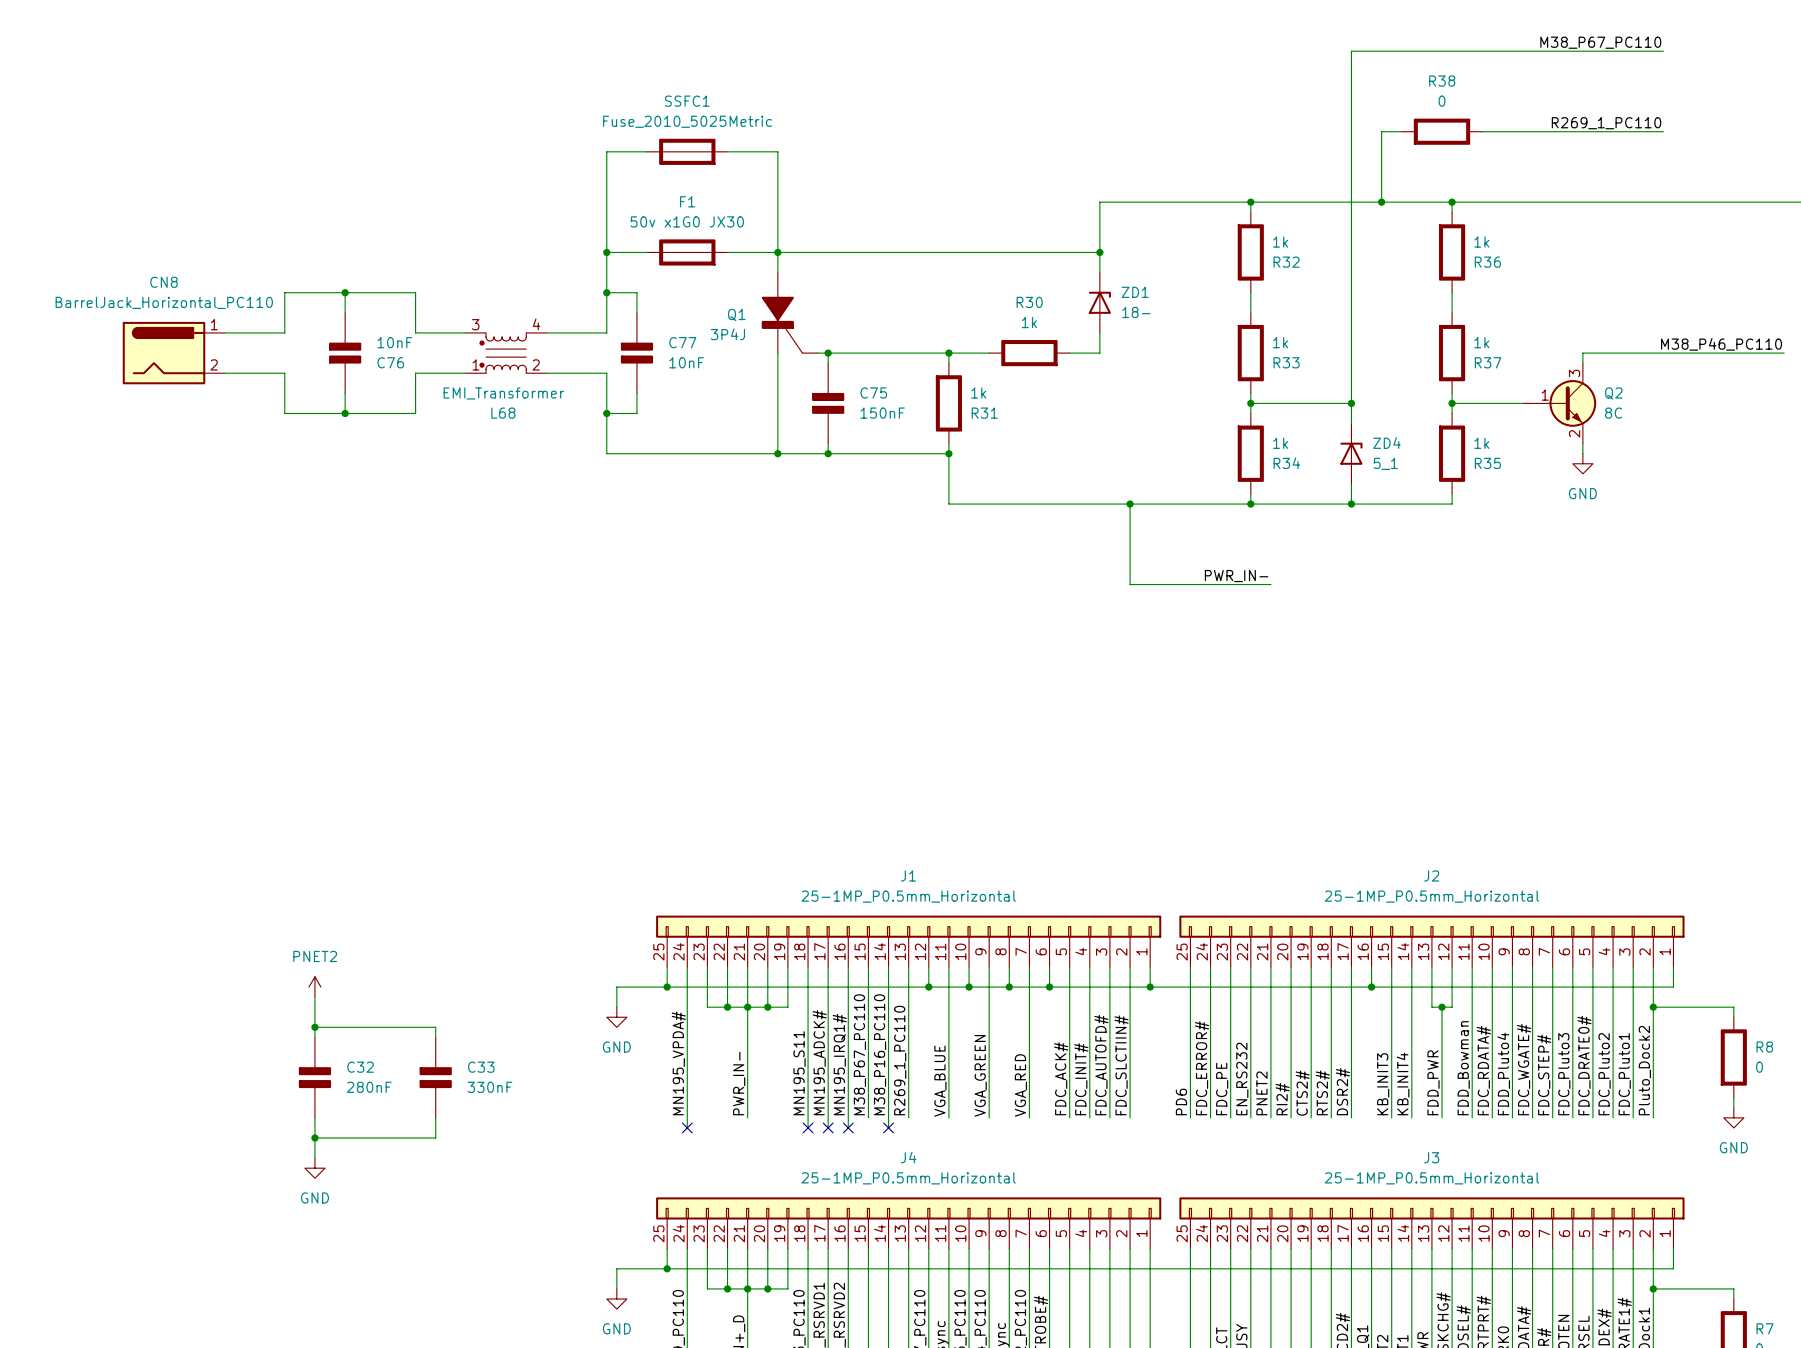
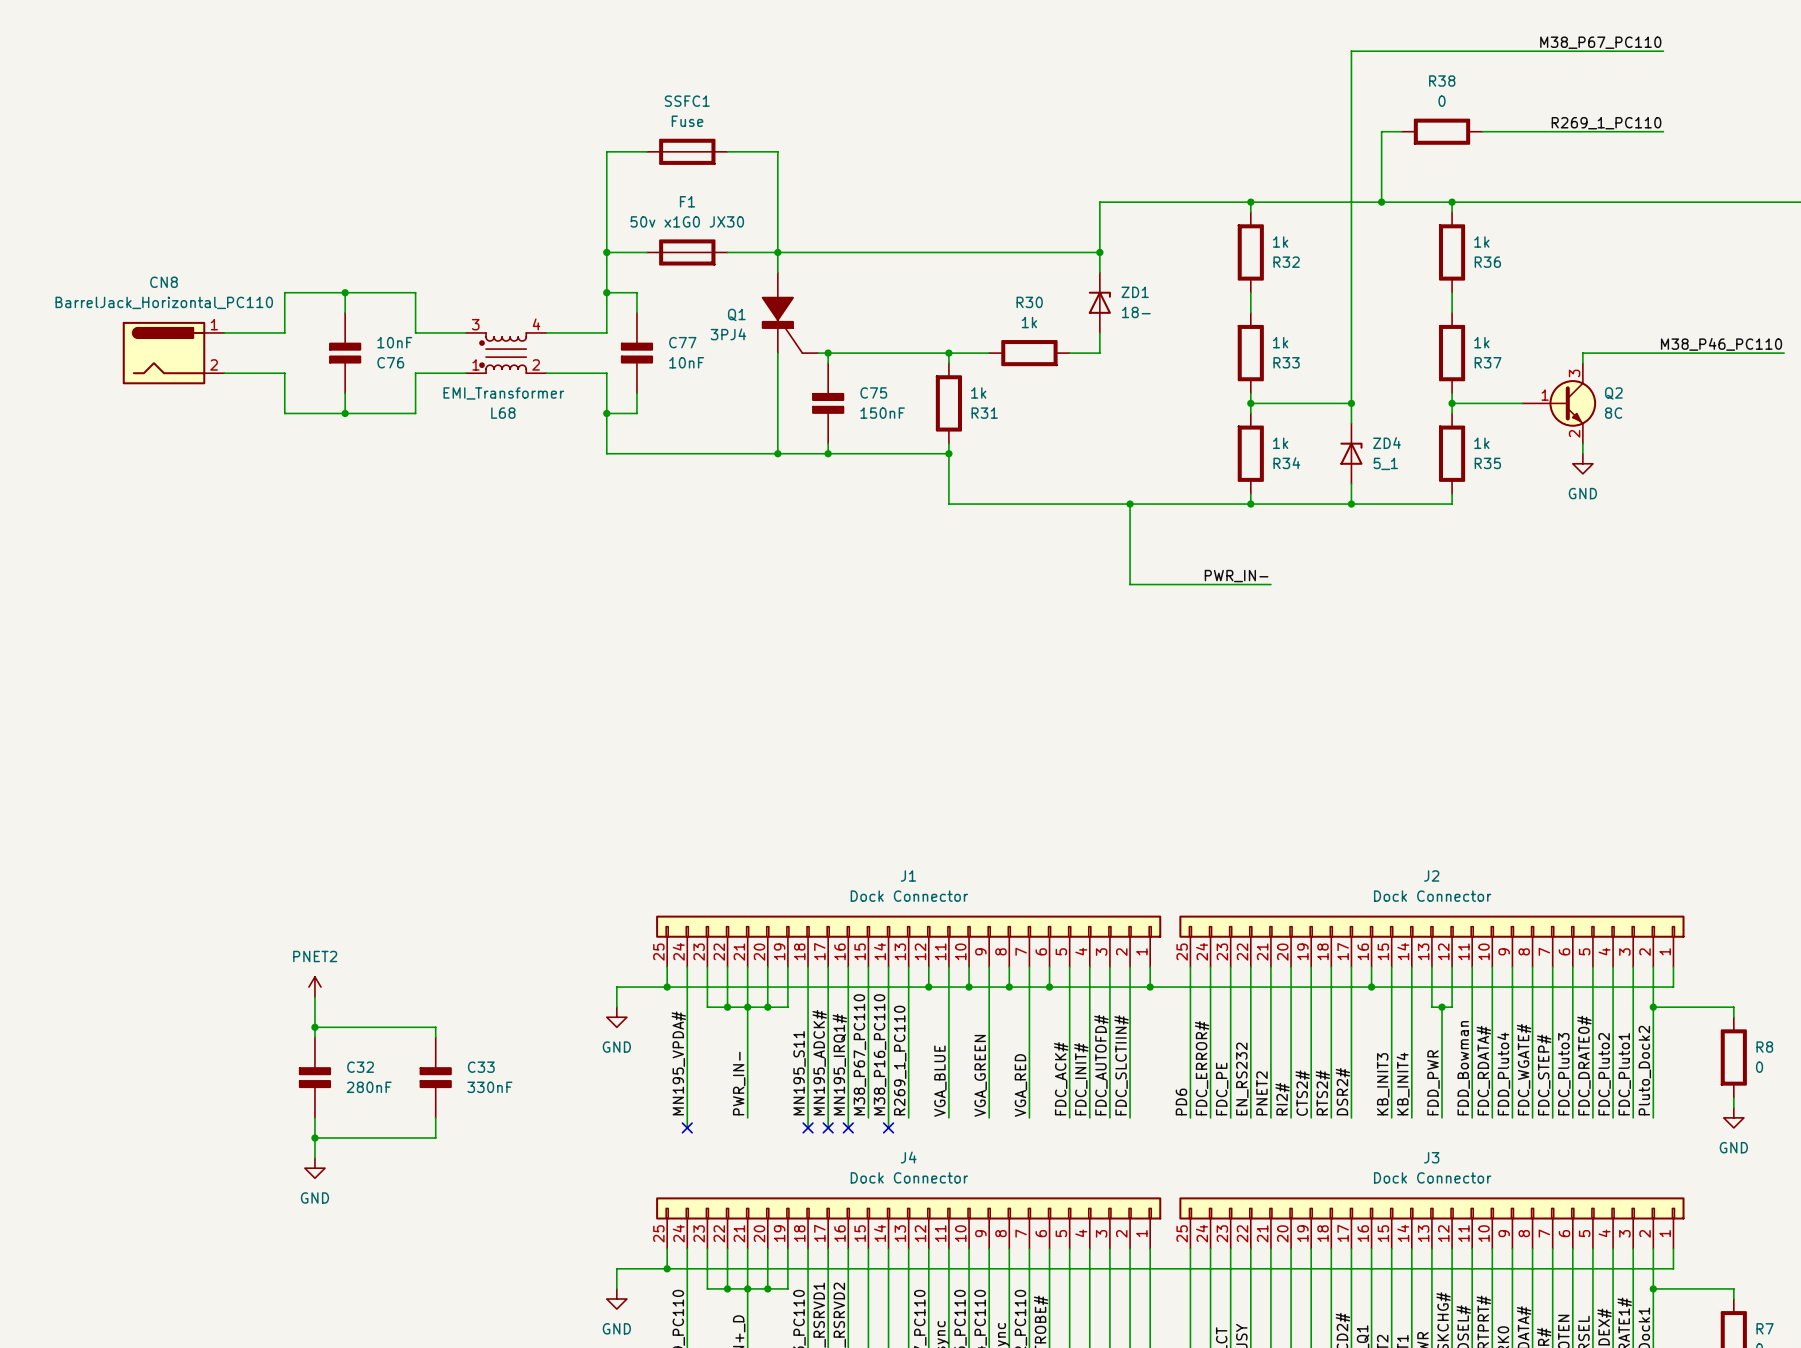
SSFC1 value: Fuse_2010_5025Metric (687, 121) -> Fuse (687, 121)
Q1 value: 3P4J (727, 334) -> 3PJ4 (728, 334)
J1 value: 25-1MP_P0.5mm_Horizontal (908, 896) -> Dock Connector (909, 896)
J2 value: 25-1MP_P0.5mm_Horizontal (1431, 896) -> Dock Connector (1432, 896)
J4 value: 25-1MP_P0.5mm_Horizontal (908, 1178) -> Dock Connector (909, 1177)
J3 value: 25-1MP_P0.5mm_Horizontal (1431, 1178) -> Dock Connector (1432, 1177)

